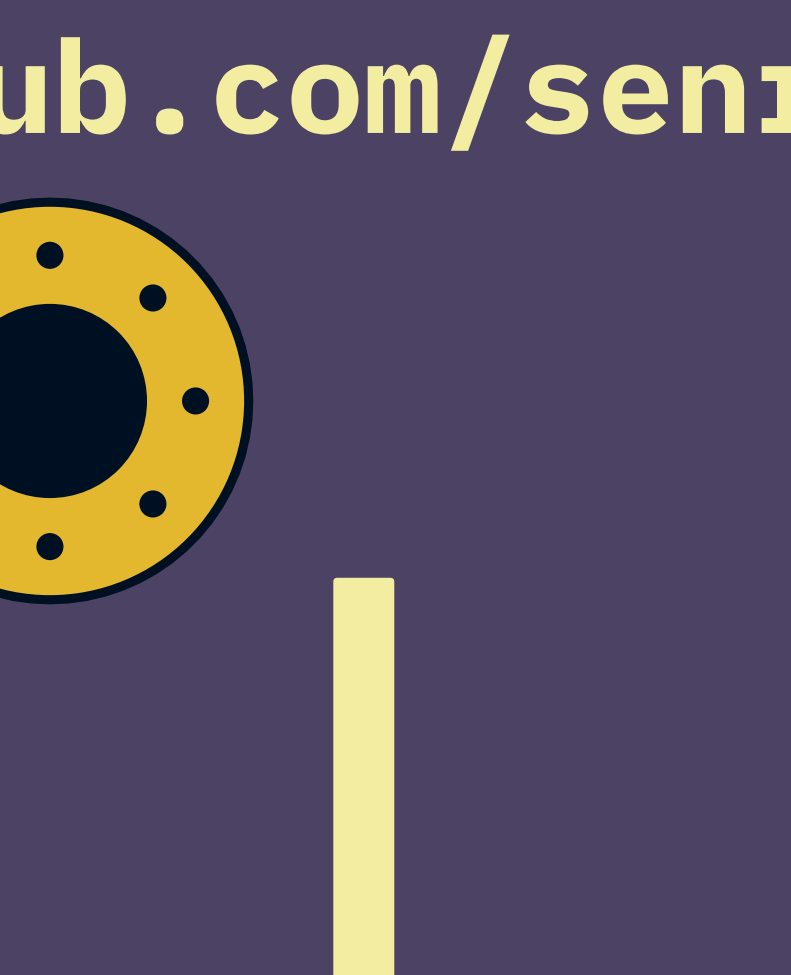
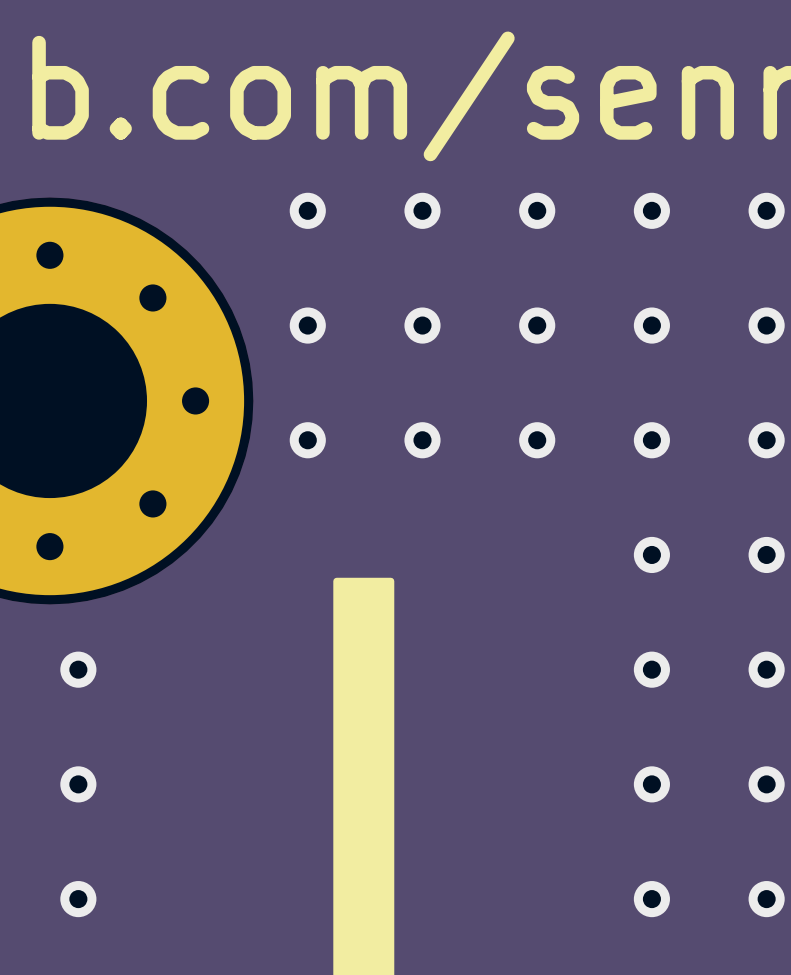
via: none -> (307, 210)
via: none -> (422, 210)
via: none -> (537, 210)
via: none -> (651, 210)
via: none -> (766, 210)
via: none -> (307, 325)
via: none -> (422, 325)
via: none -> (537, 325)
via: none -> (651, 325)
via: none -> (766, 325)
via: none -> (307, 440)
via: none -> (422, 440)
via: none -> (537, 440)
via: none -> (651, 440)
via: none -> (766, 440)
via: none -> (651, 554)
via: none -> (766, 554)
via: none -> (78, 669)
via: none -> (651, 669)
via: none -> (766, 669)
via: none -> (78, 784)
via: none -> (651, 784)
via: none -> (766, 784)
via: none -> (78, 899)
via: none -> (651, 899)
via: none -> (766, 899)

